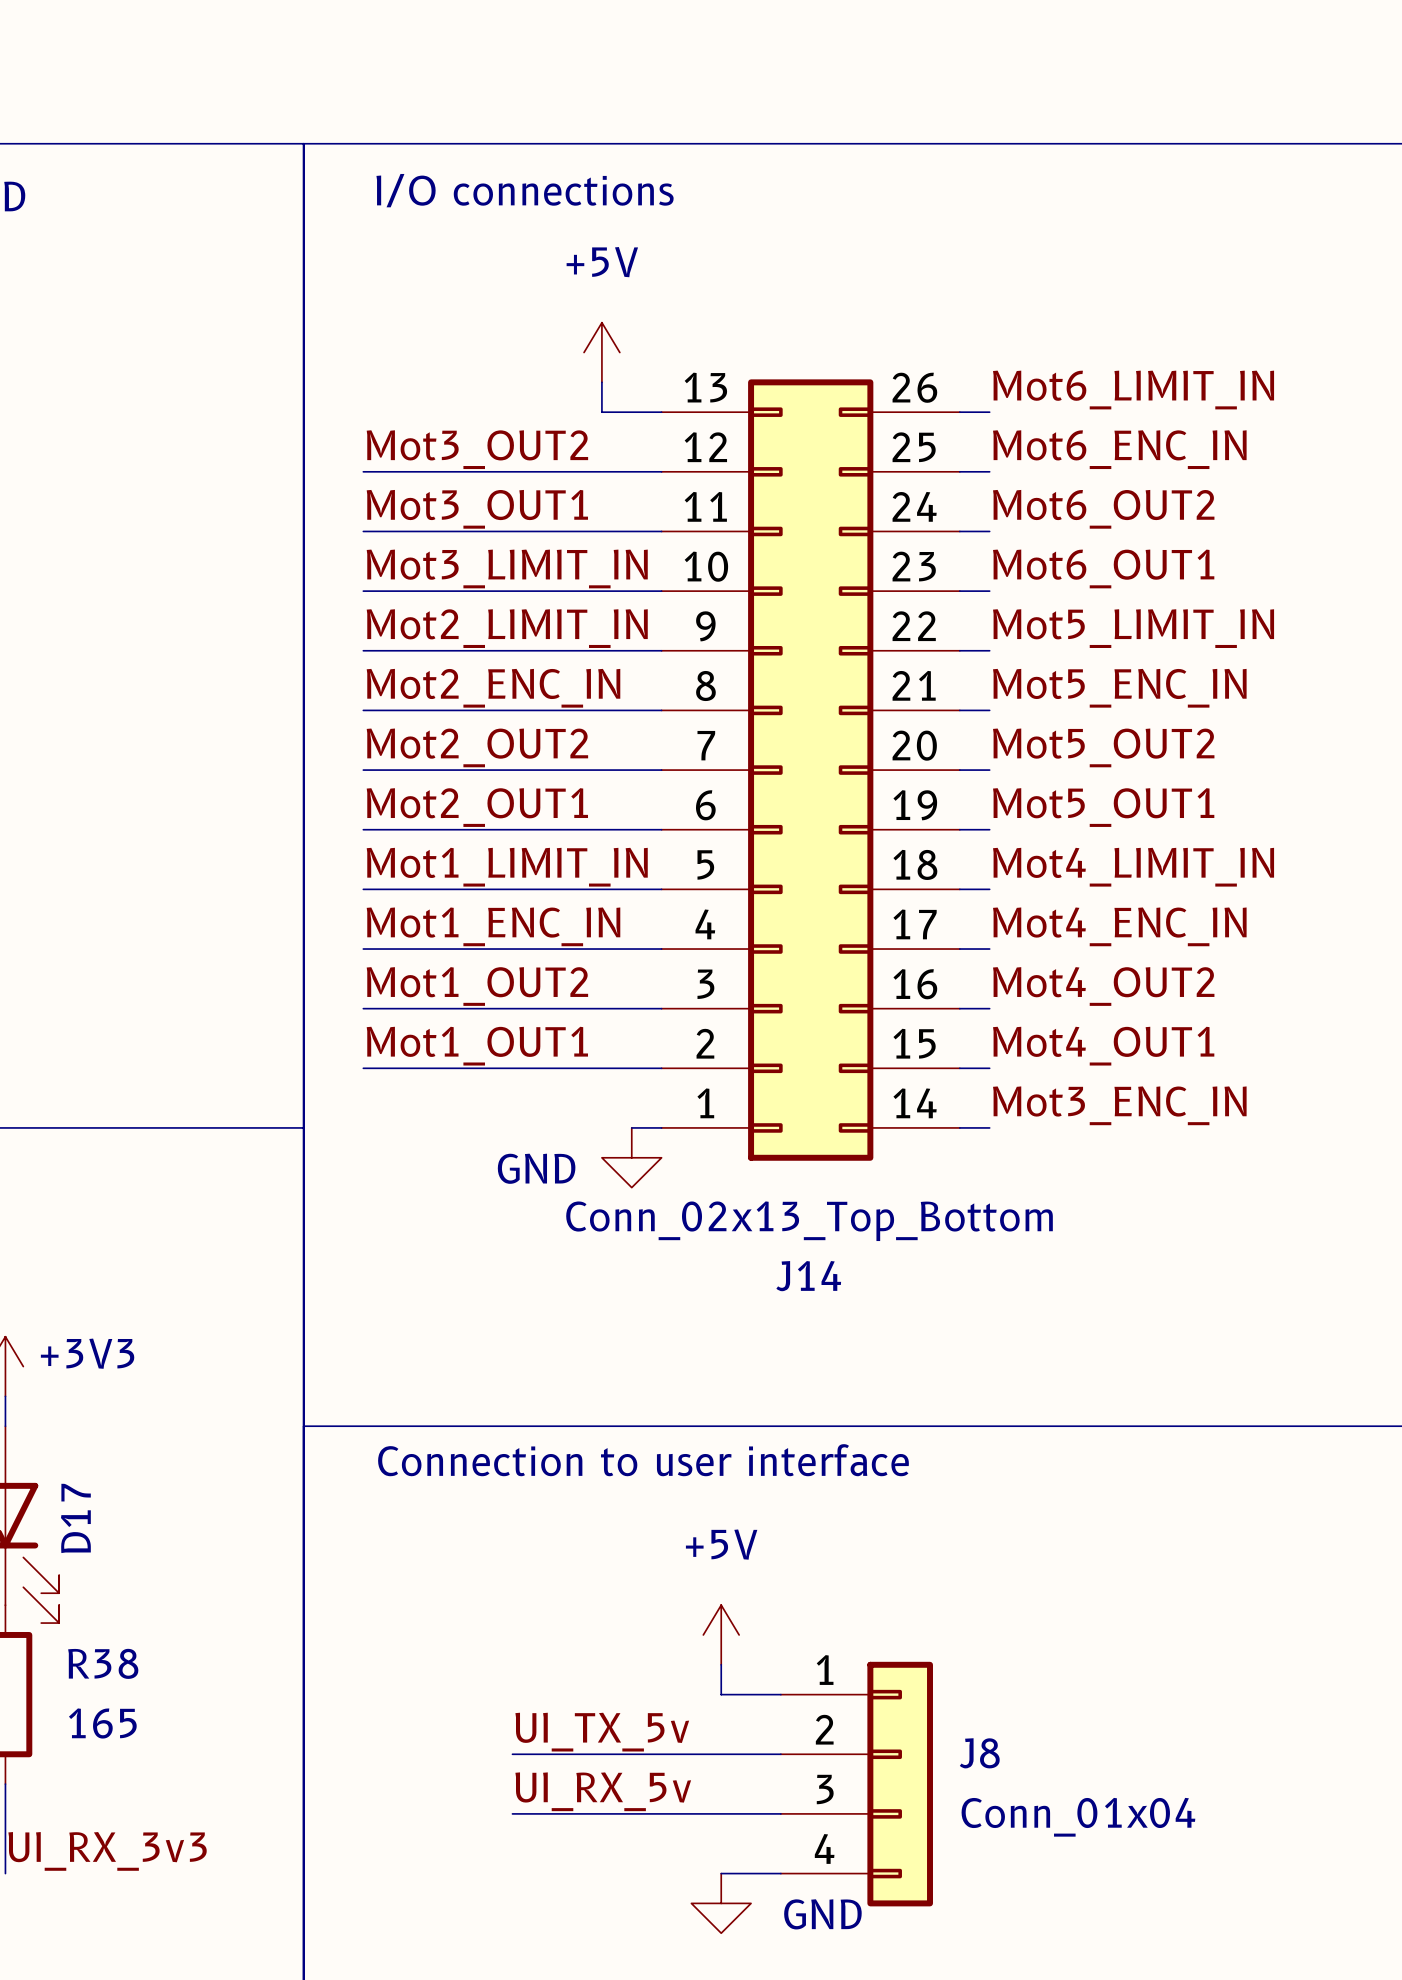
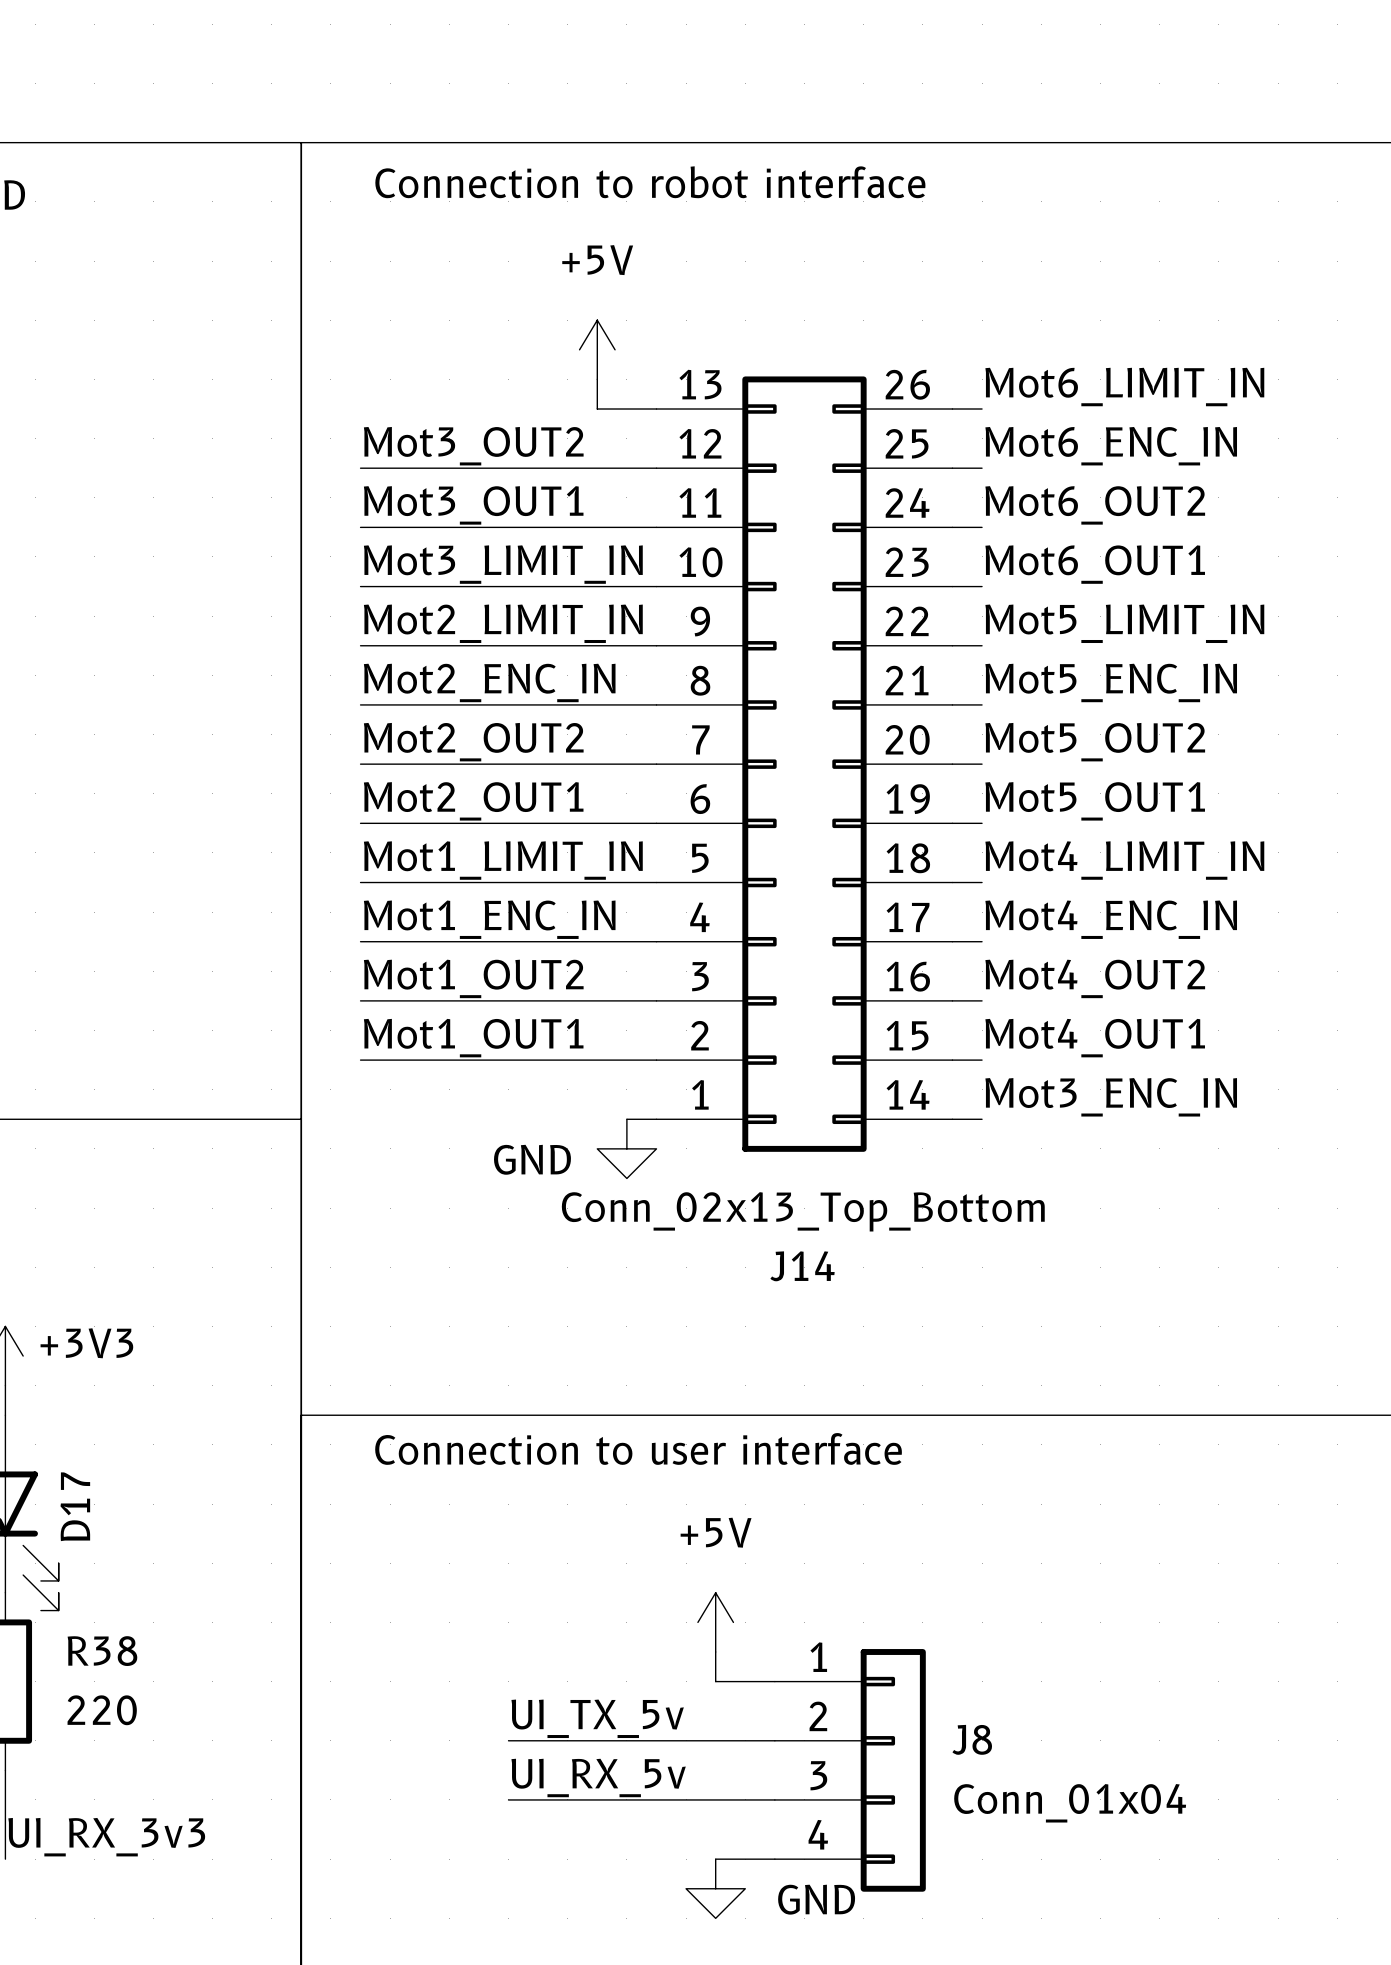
text: none -> Connection to robot interface (650, 182)
text: I/O connections (525, 190) -> none
R38 value: 165 (102, 1723) -> 220 (102, 1710)

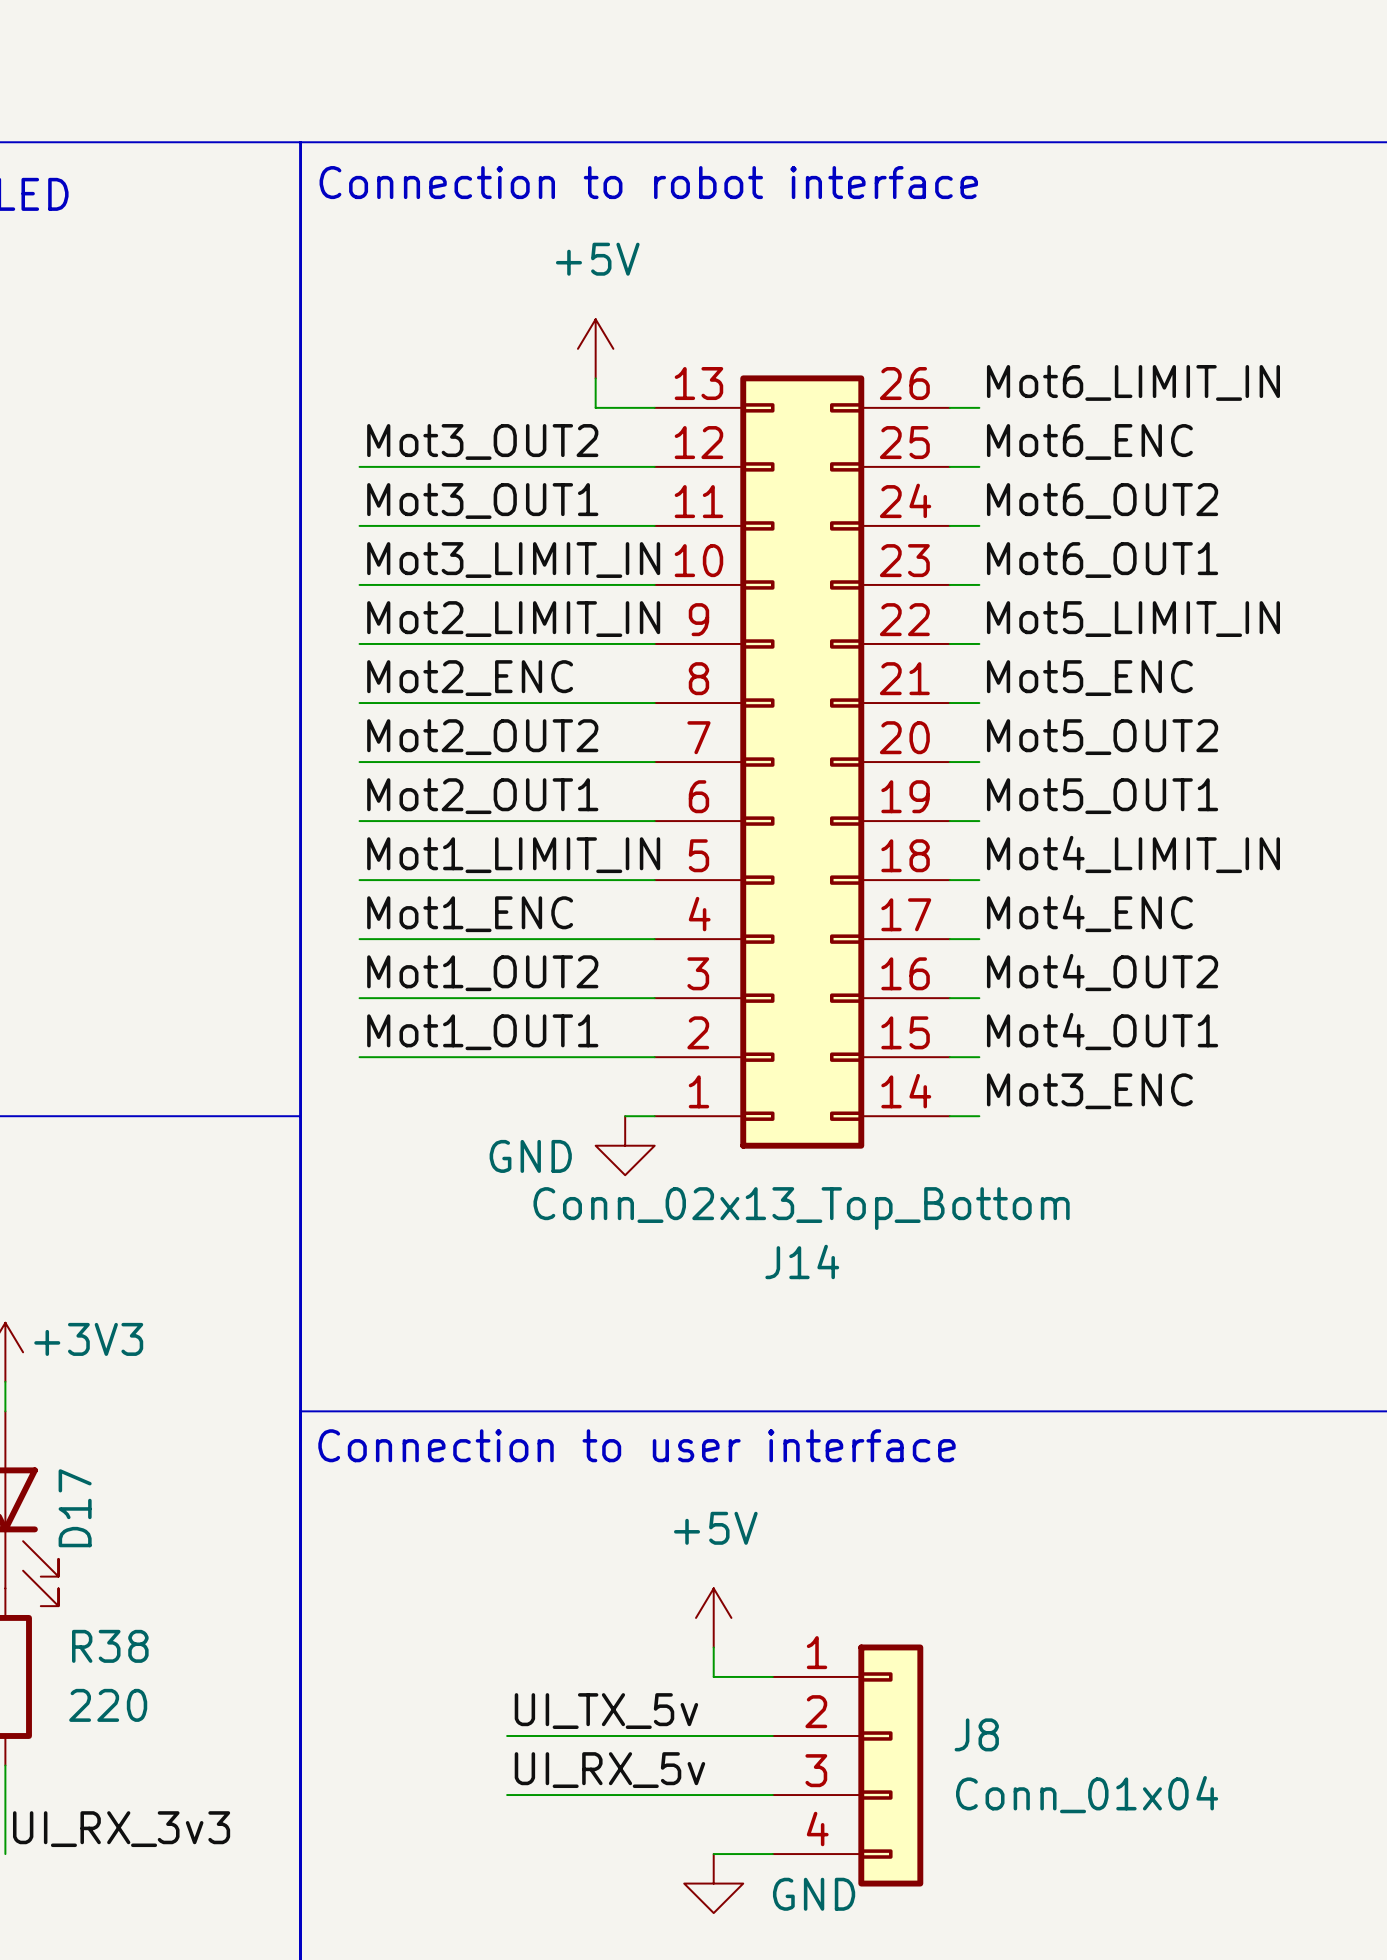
label: Mot6_ENC_IN (1111, 446) -> Mot6_ENC (1089, 441)
label: Mot2_ENC_IN (489, 682) -> Mot2_ENC (470, 678)
label: Mot5_ENC_IN (1111, 682) -> Mot5_ENC (1089, 678)
label: Mot1_ENC_IN (489, 919) -> Mot1_ENC (470, 914)
label: Mot4_ENC_IN (1111, 919) -> Mot4_ENC (1089, 913)
label: Mot3_ENC_IN (1111, 1097) -> Mot3_ENC (1089, 1091)

